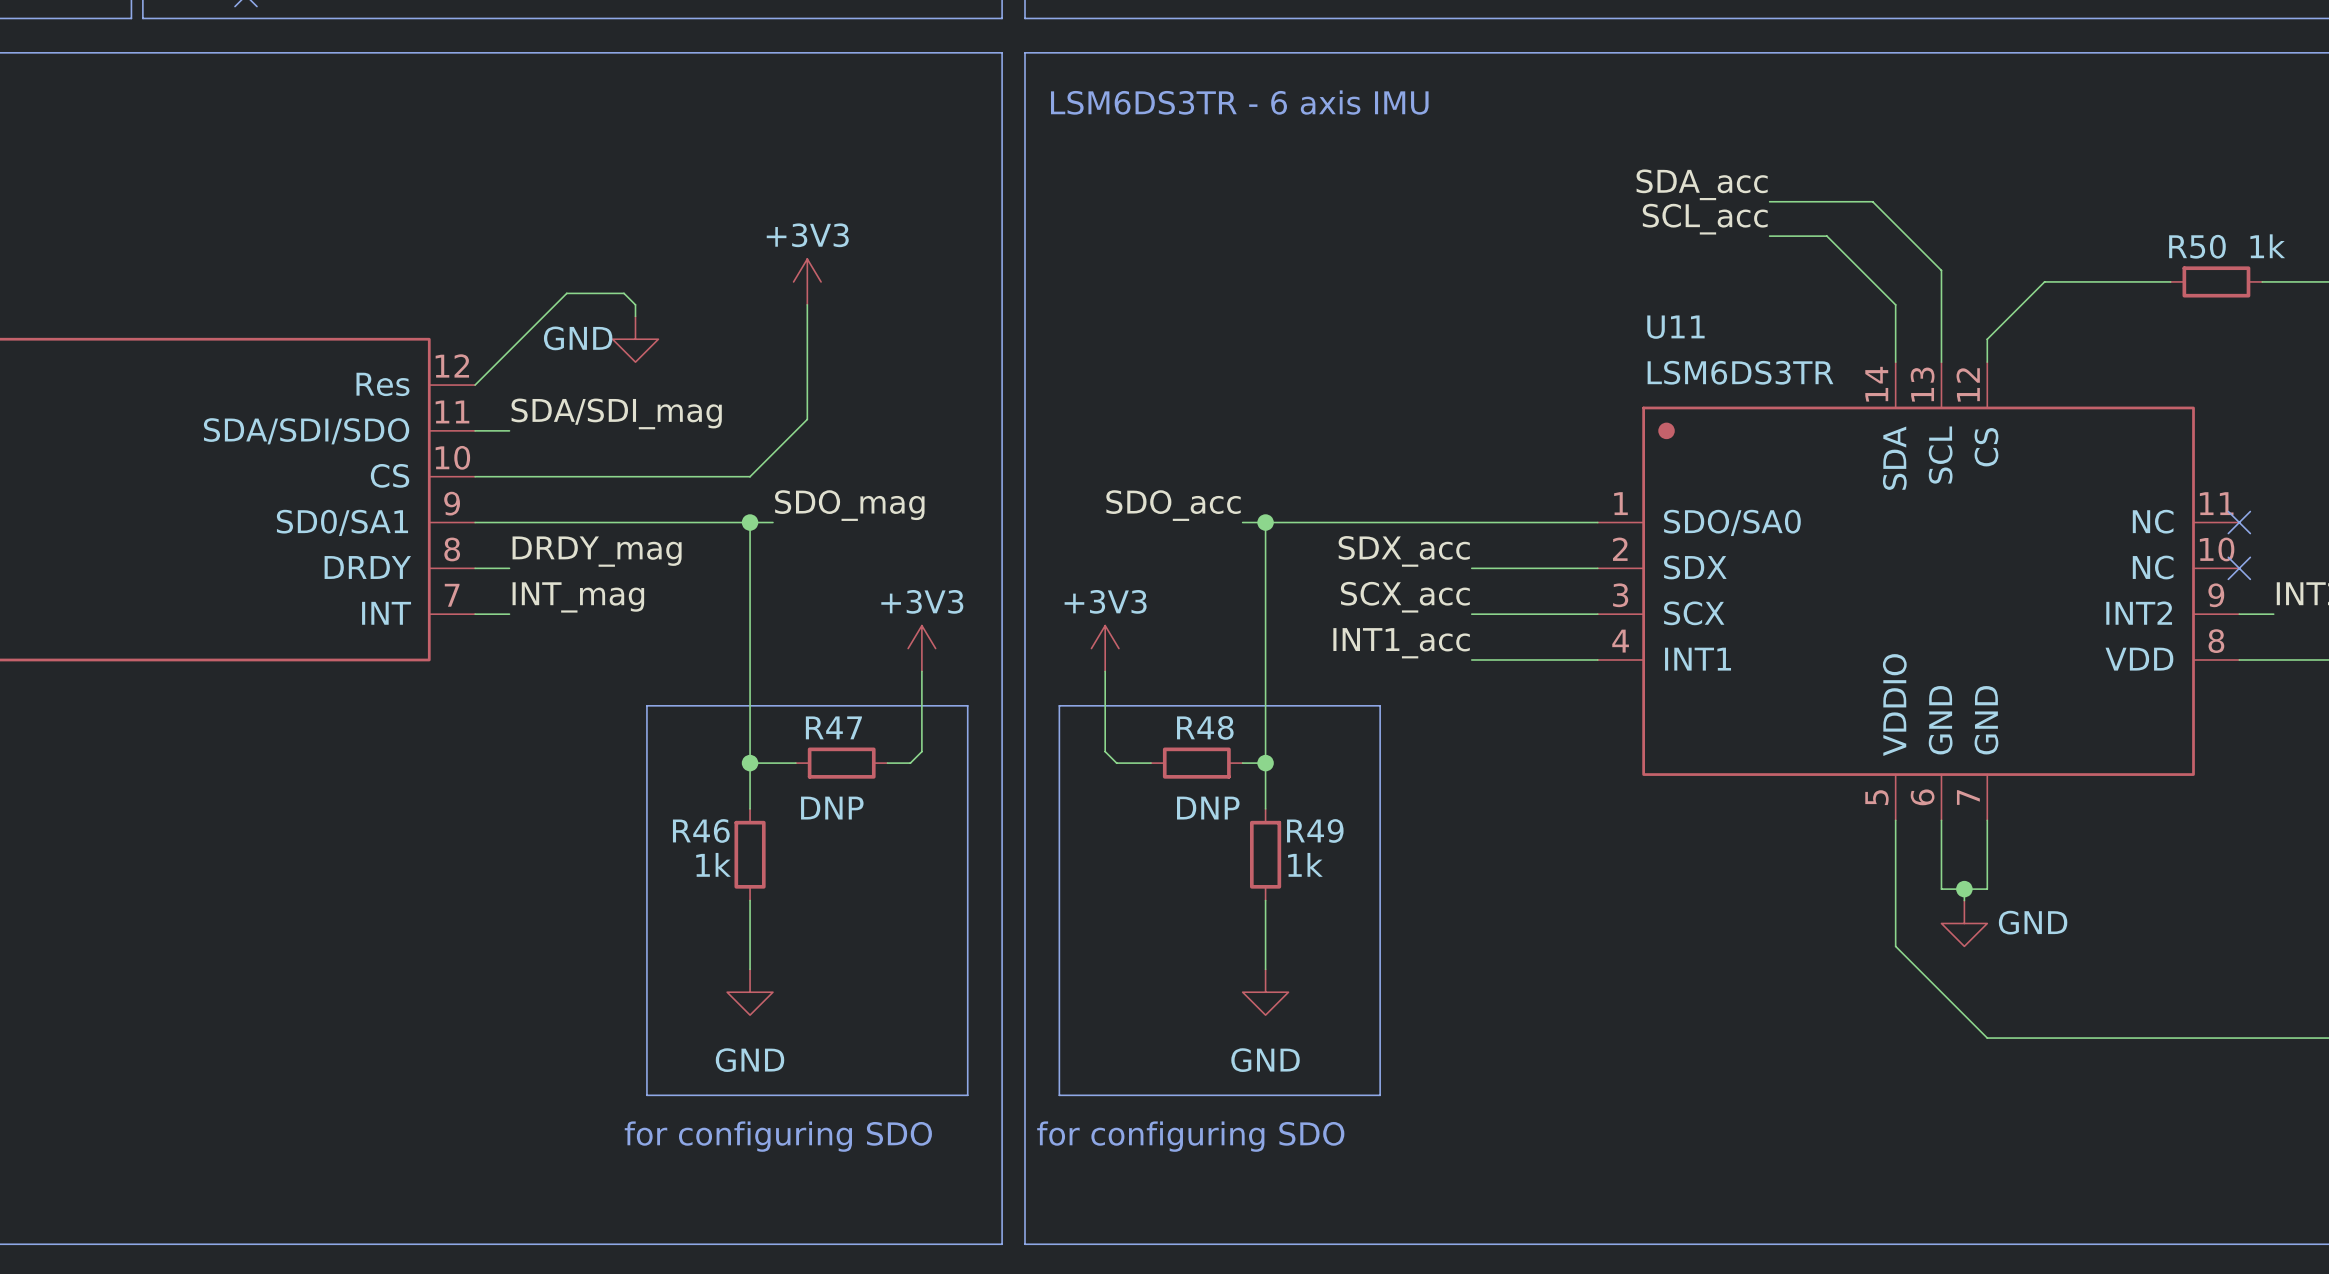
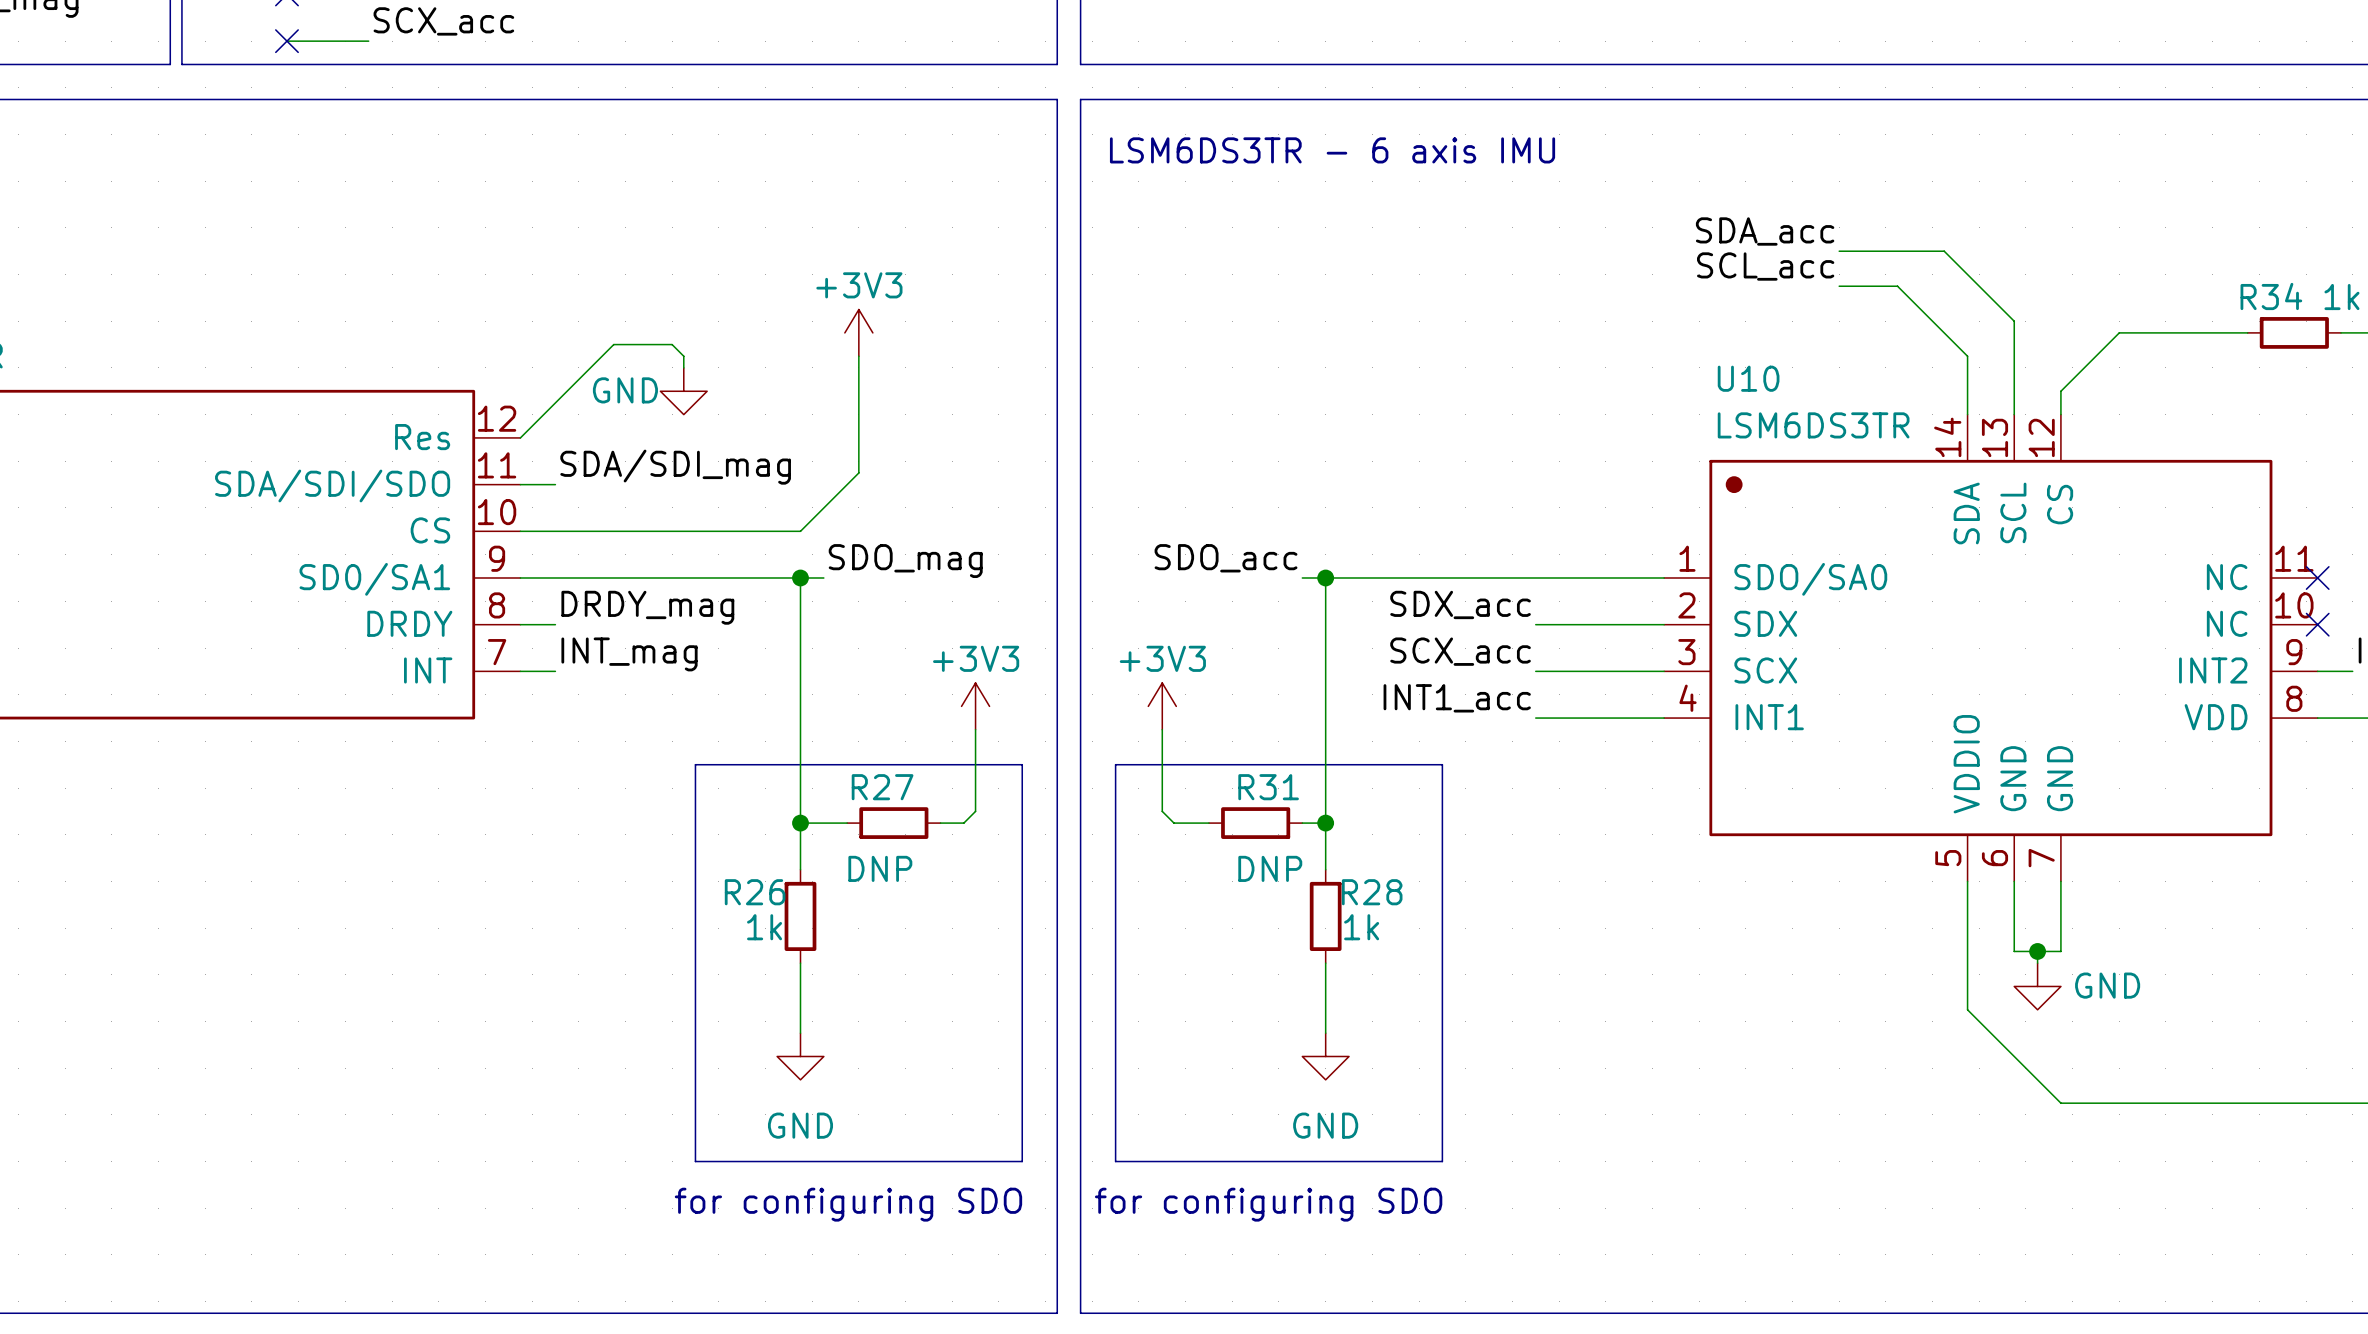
R50 name: R50 (2197, 246) -> R34 (2271, 296)
U11 name: U11 (1675, 327) -> U10 (1748, 378)
R47 name: R47 (833, 727) -> R27 (882, 787)
R48 name: R48 (1205, 727) -> R31 (1268, 787)
R46 name: R46 (701, 830) -> R26 (755, 892)
R49 name: R49 (1315, 830) -> R28 (1372, 892)

